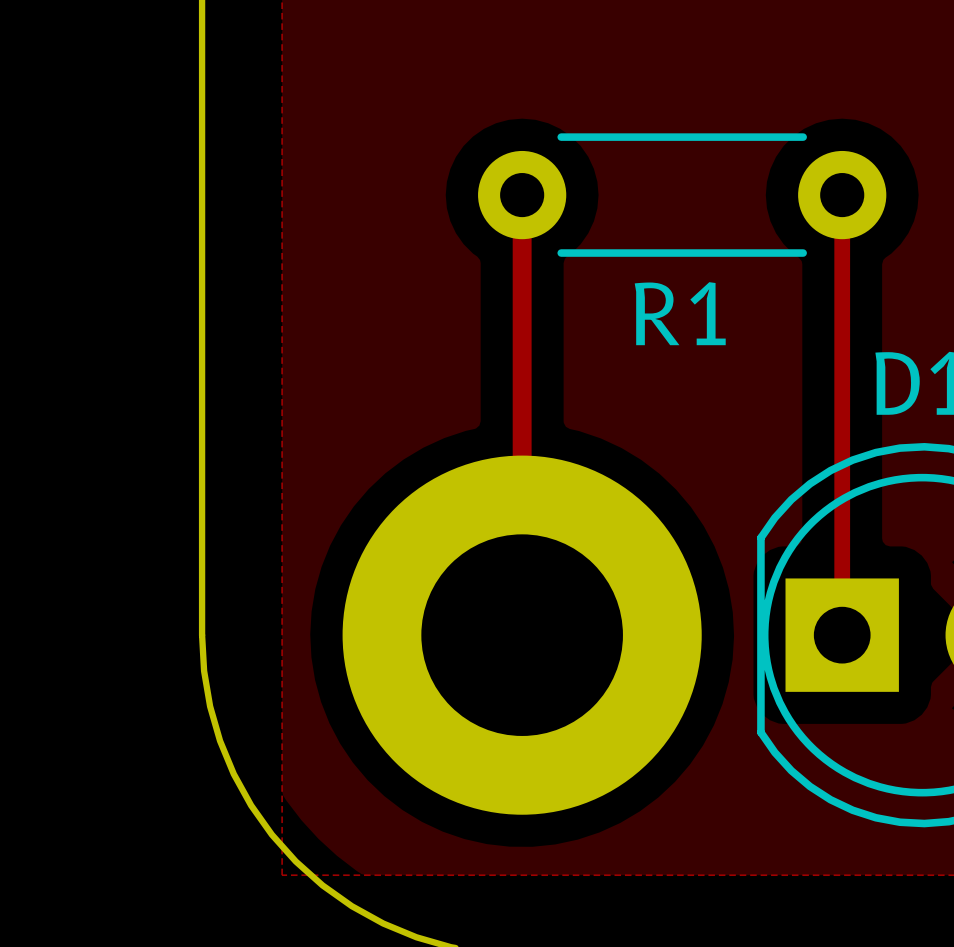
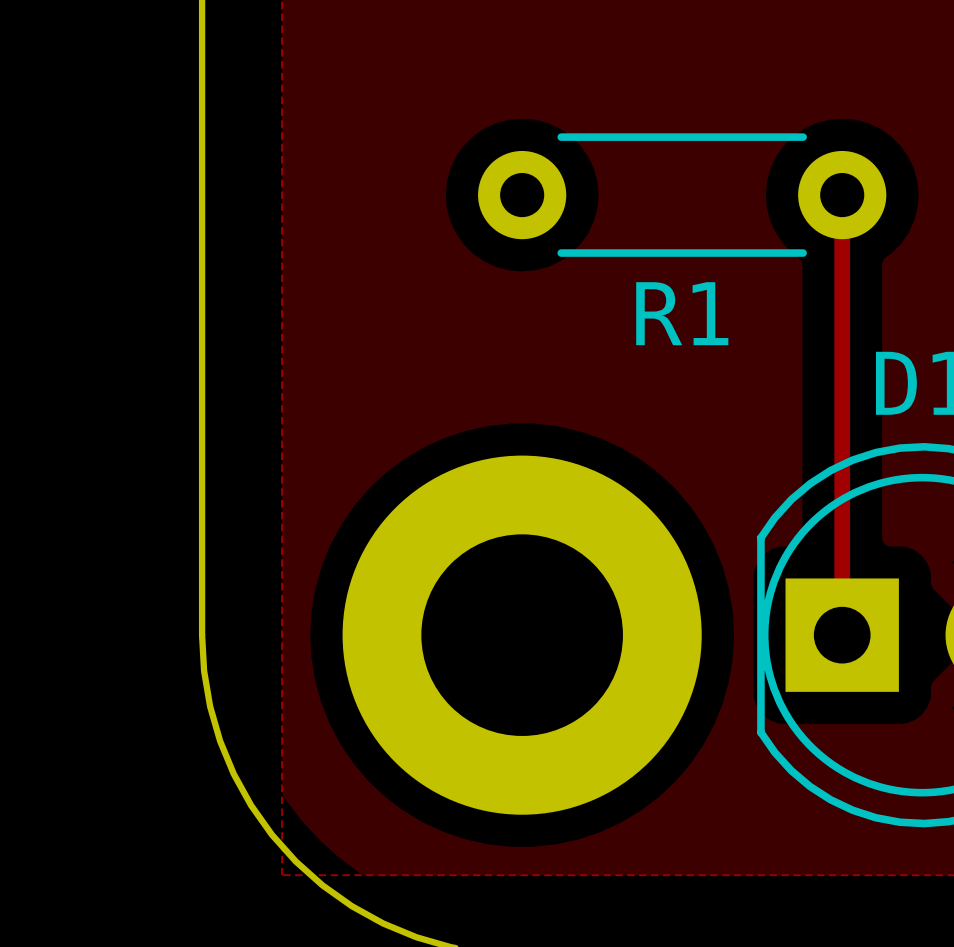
track: (522, 195) (522, 635) -> none

